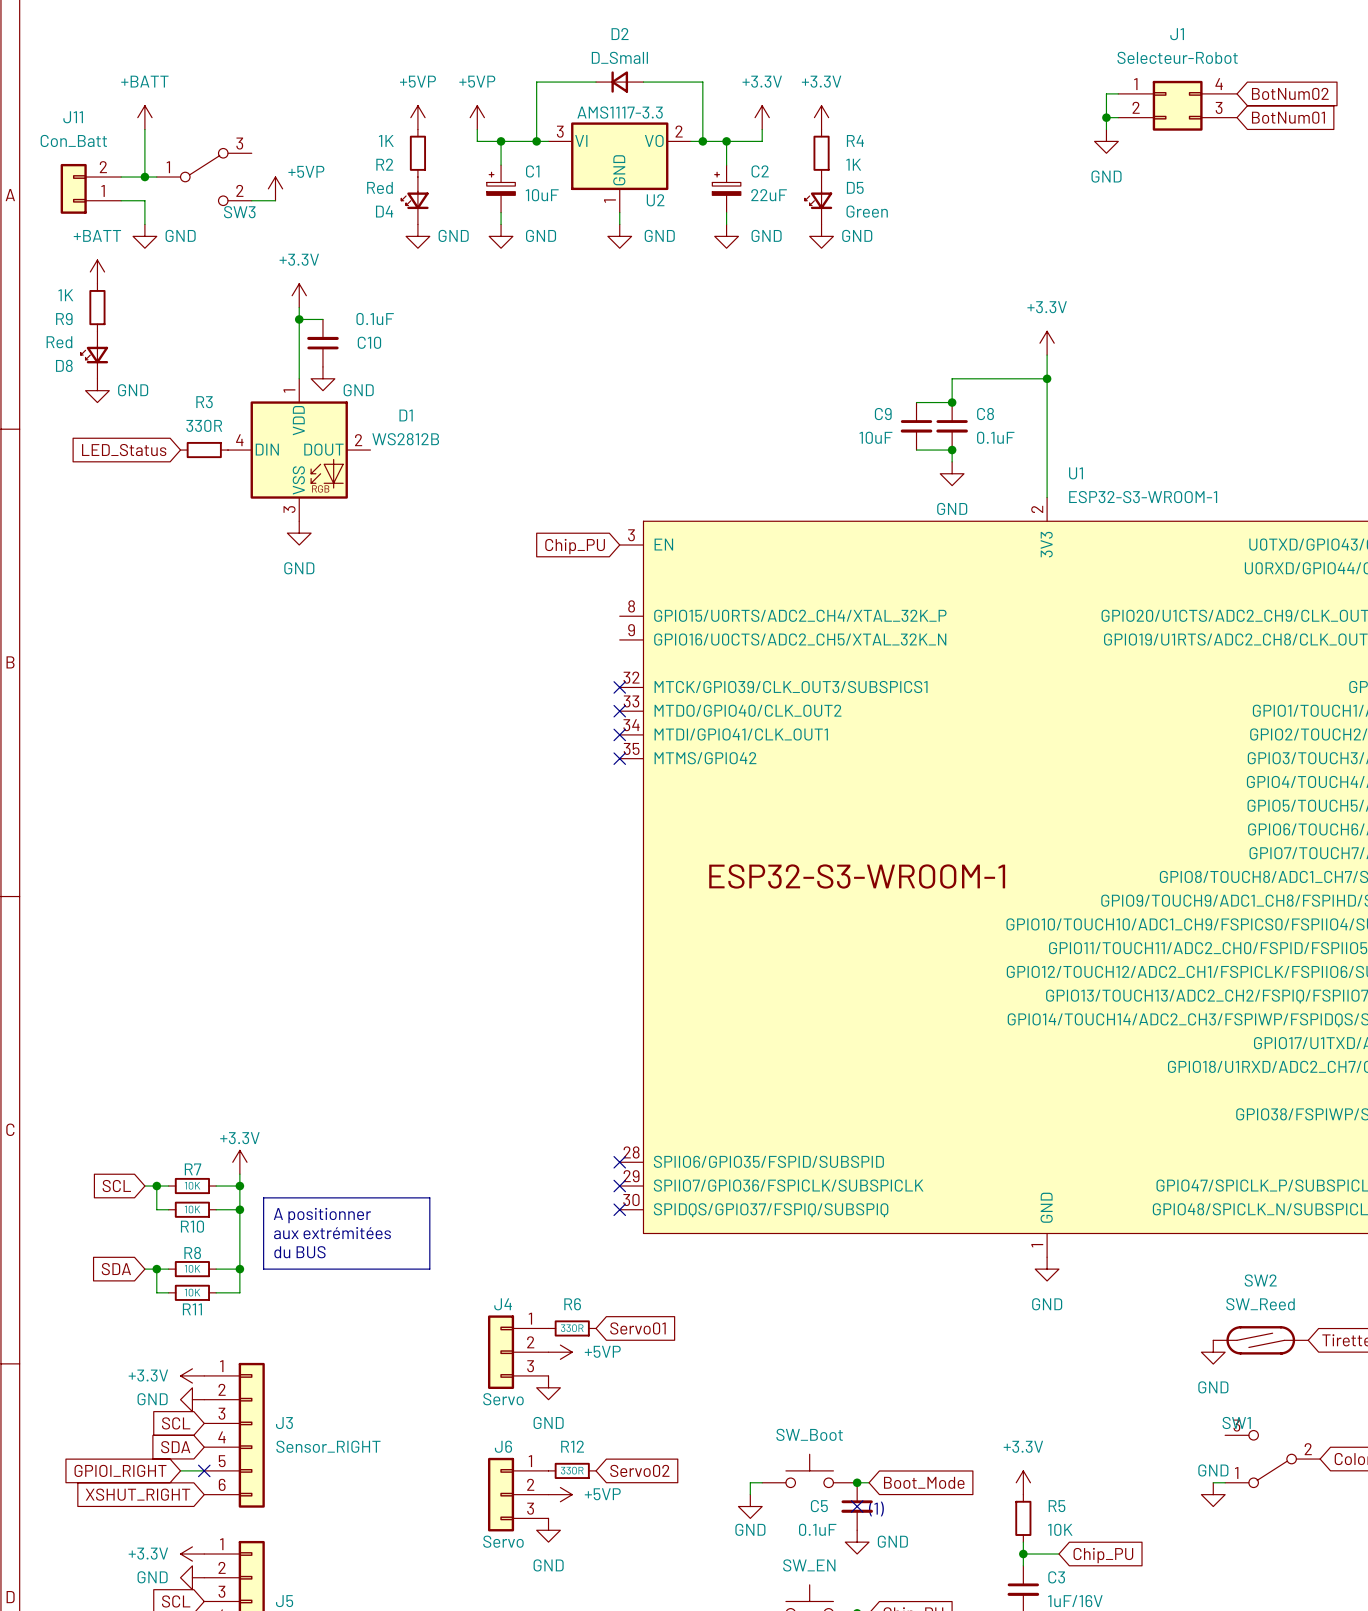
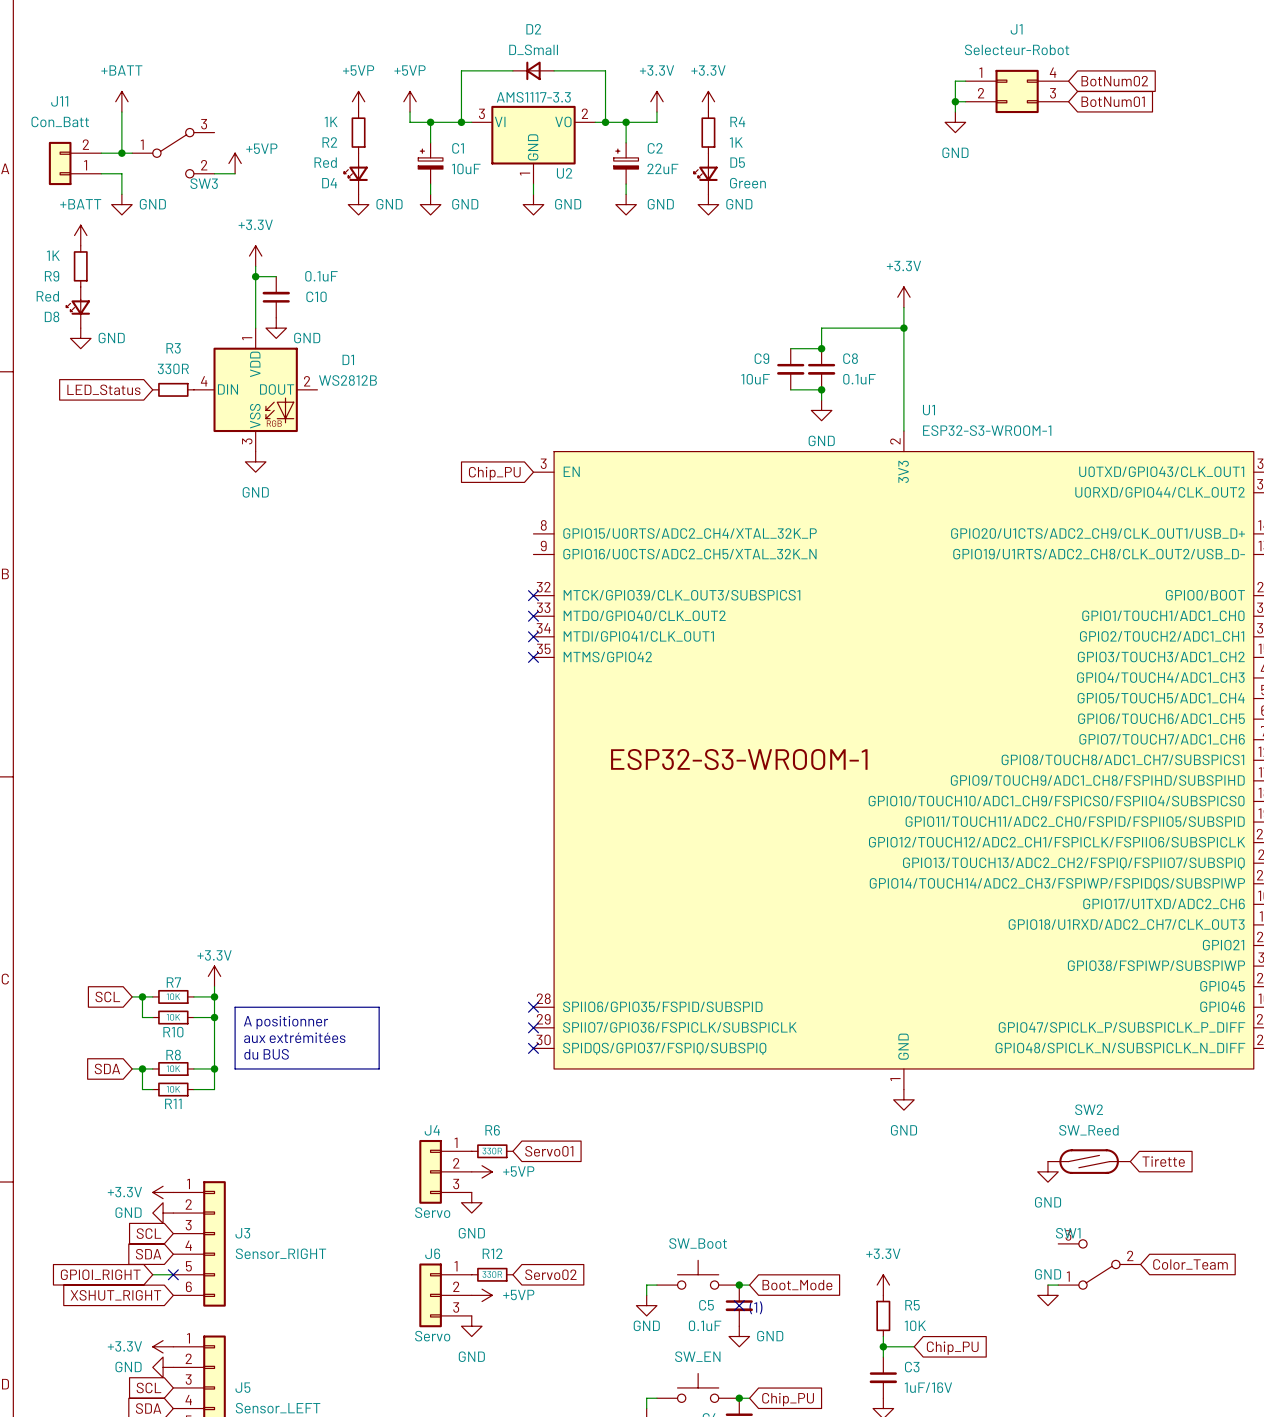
junction: none -> (142, 996)
junction: none -> (214, 996)
power symbol position: +3.3V (239, 1162) -> +3.3V (214, 976)
wire: (239, 1174) (239, 1292) (216, 1292) -> (214, 986) (214, 1089) (193, 1089)
global label position: SCL (116, 1186) -> SCL (107, 996)
wire: (144, 1186) (168, 1186) -> (132, 996) (152, 996)
wire: (156, 1186) (156, 1209) (168, 1209) -> (142, 996) (142, 1017) (152, 1017)
junction: (156, 1186) -> none
R7 position: (192, 1186) -> (173, 996)
wire: (216, 1186) (239, 1186) -> (193, 996) (214, 996)
junction position: (239, 1186) -> (214, 1017)
line: (263, 1197) (429, 1197) (429, 1269) (263, 1269) (263, 1197) -> (235, 1007) (379, 1007) (379, 1068) (235, 1068) (235, 1007)
R10 position: (192, 1209) -> (173, 1017)
wire: (216, 1209) (239, 1209) -> (193, 1017) (214, 1017)
junction: (239, 1209) -> none
text position: A positionner (322, 1215) -> A positionner (286, 1022)
junction: none -> (142, 1068)
junction: none -> (214, 1068)
text position: aux extrémitées (332, 1233) -> aux extrémitées (294, 1037)
text position: du BUS (299, 1252) -> du BUS (266, 1054)
global label position: SDA (116, 1269) -> SDA (107, 1068)
wire: (144, 1269) (168, 1269) -> (132, 1068) (152, 1068)
wire: (156, 1269) (156, 1292) (168, 1292) -> (142, 1068) (142, 1089) (152, 1089)
junction: (156, 1269) -> none
R8 position: (192, 1269) -> (173, 1068)
wire: (216, 1269) (239, 1269) -> (193, 1068) (214, 1068)
junction: (239, 1269) -> none
R11 position: (192, 1292) -> (173, 1089)

